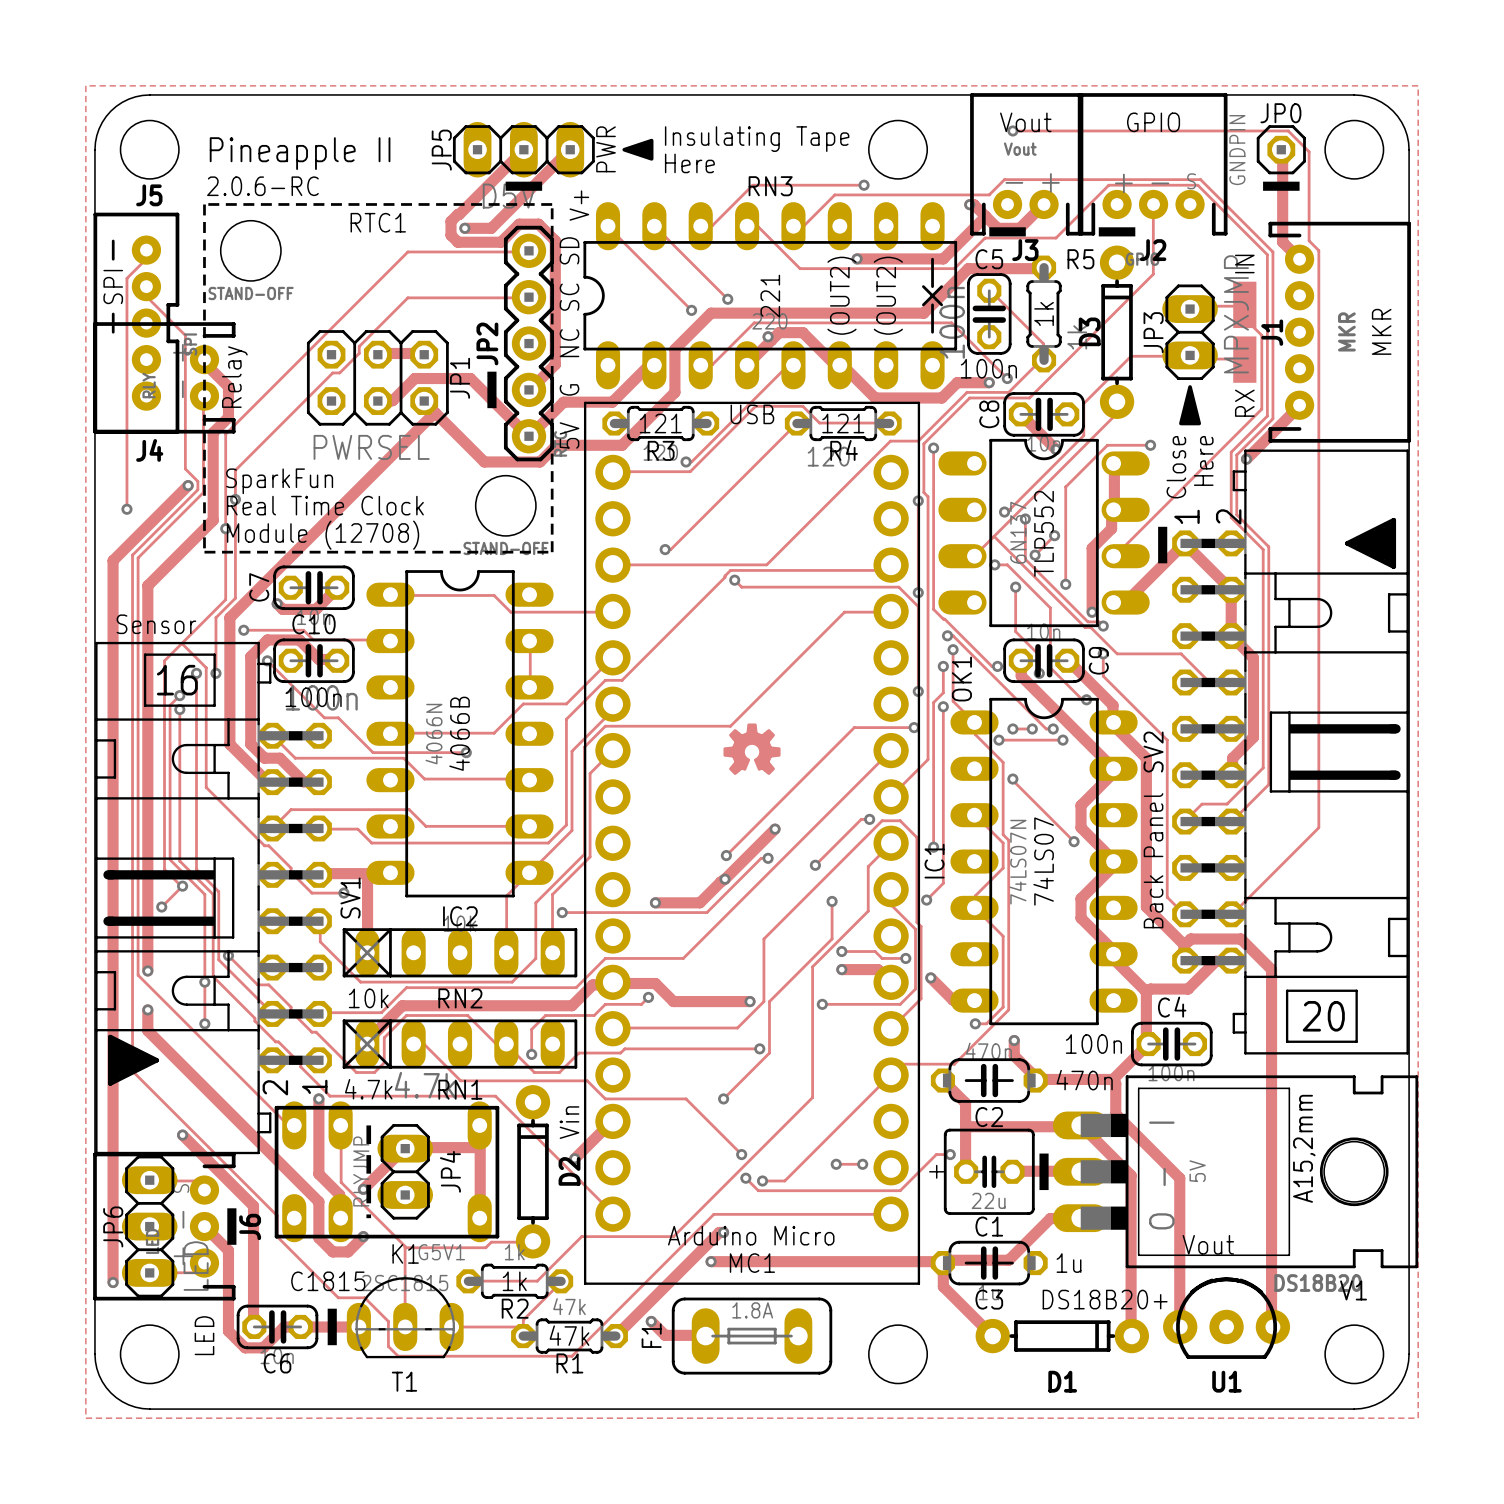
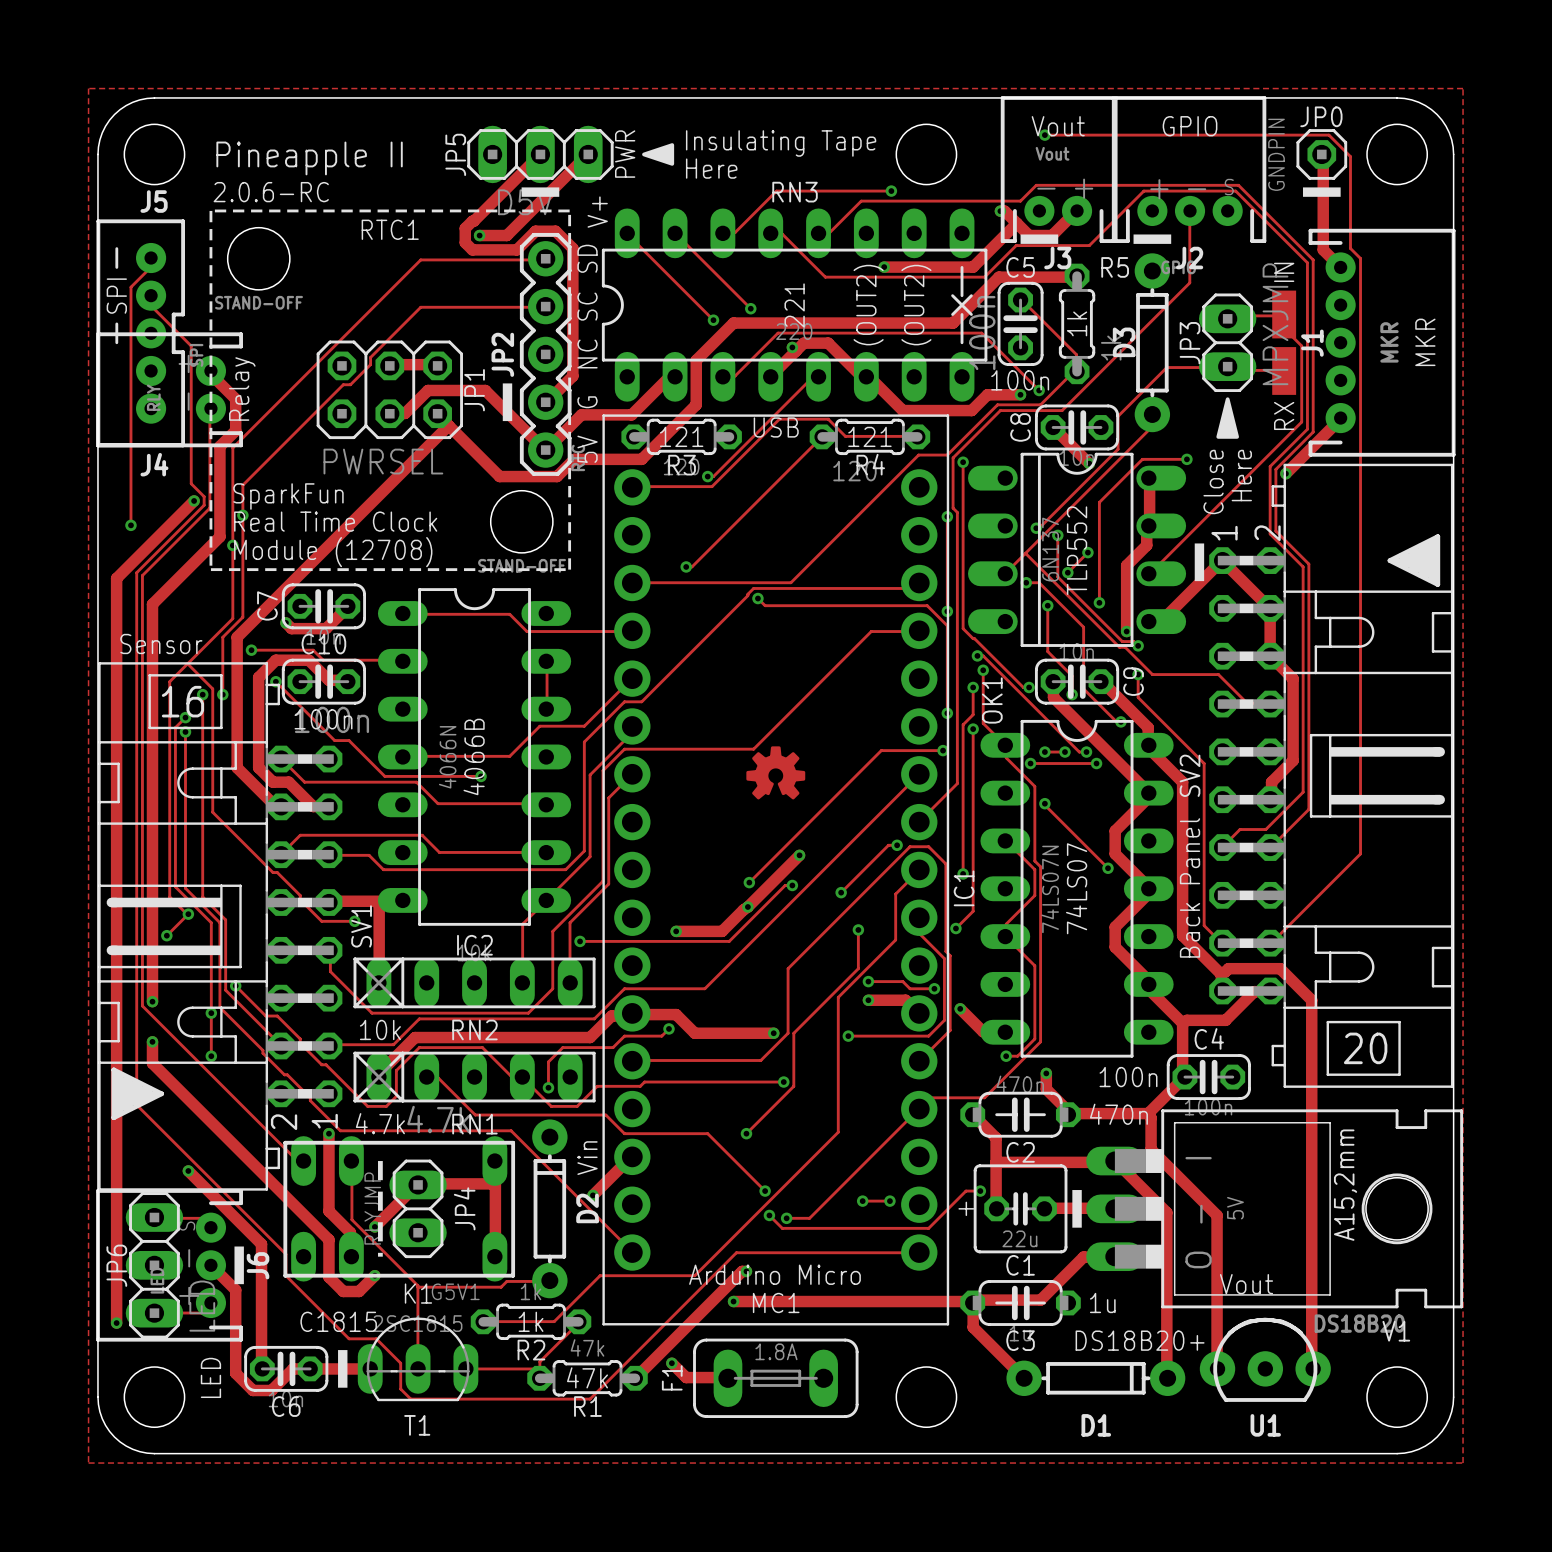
line: none -> (1039, 455) (1039, 644)

